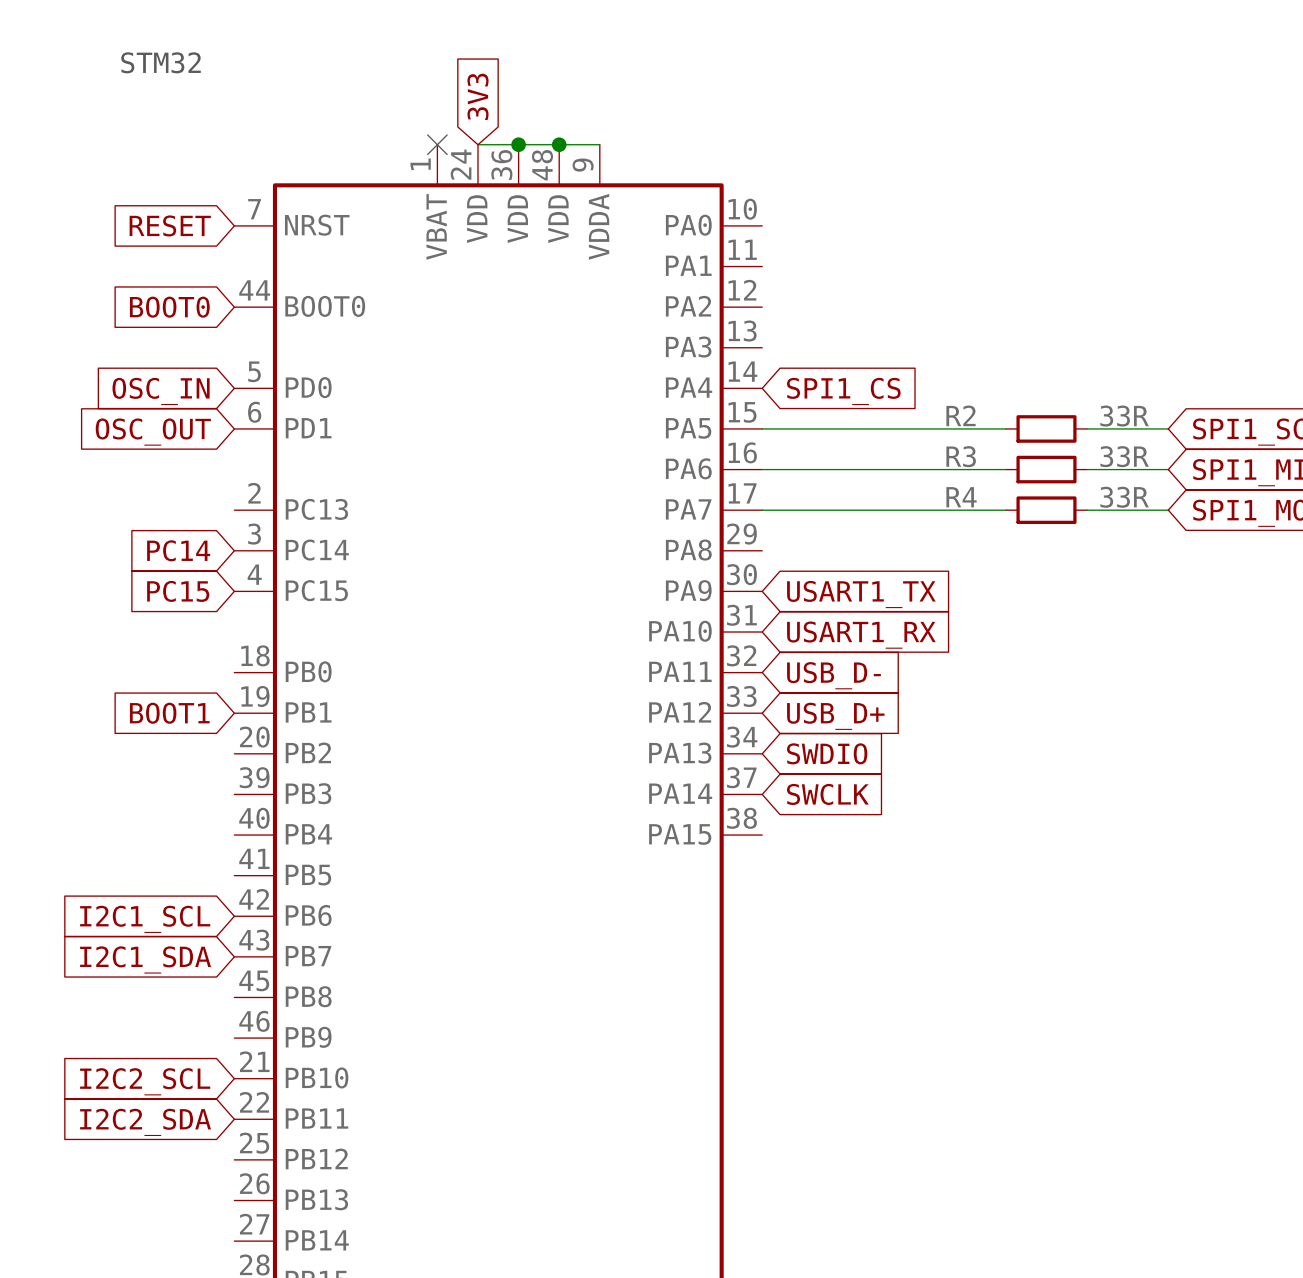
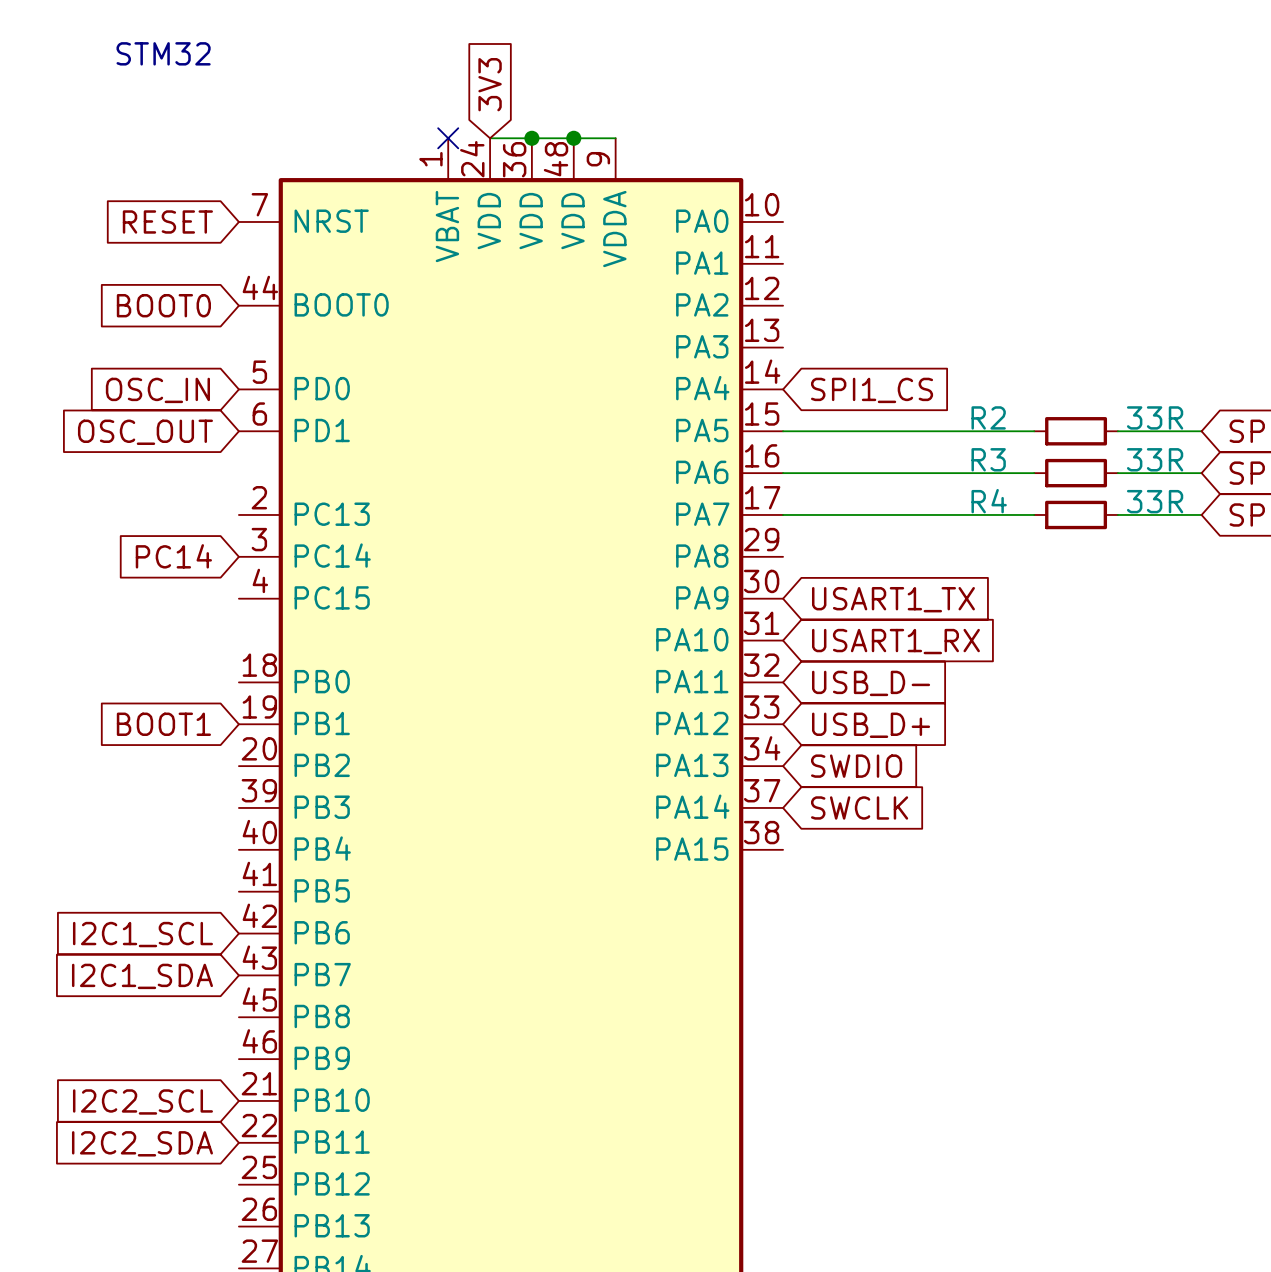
global label: PC15 (178, 591) -> none

